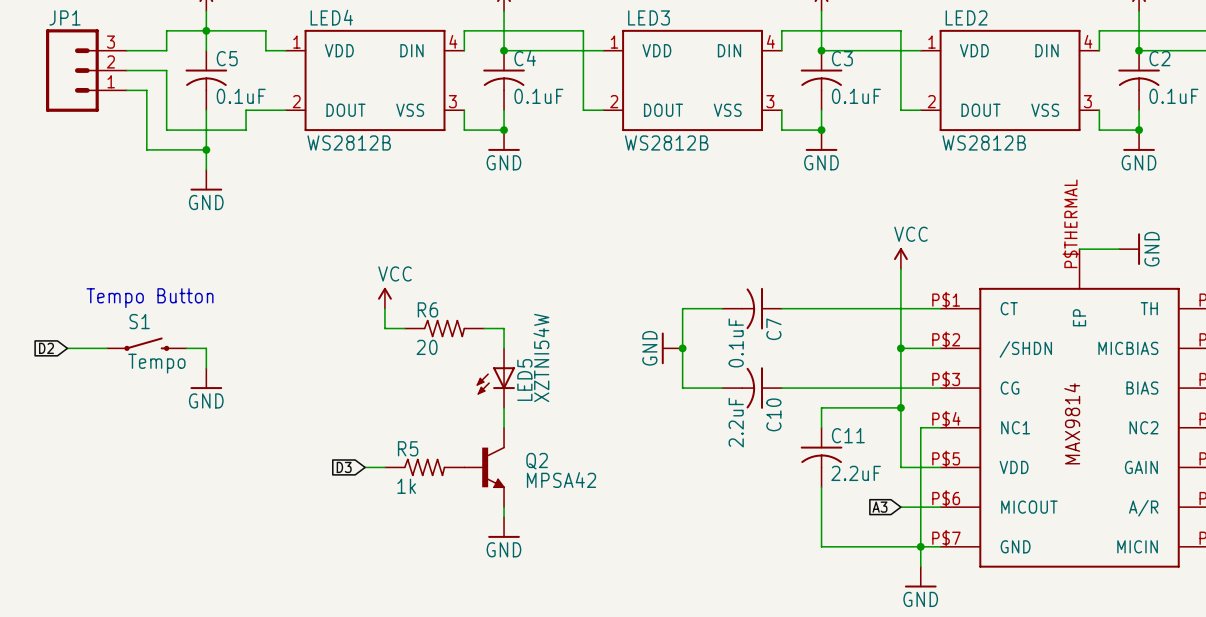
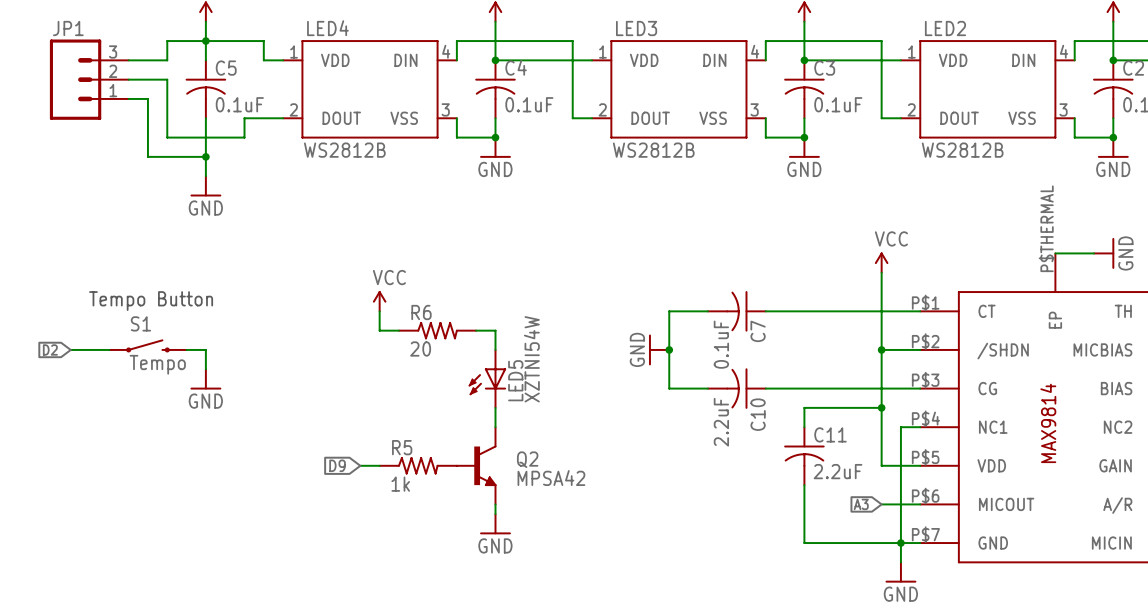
global label: D3 (344, 467) -> D9 (337, 465)

